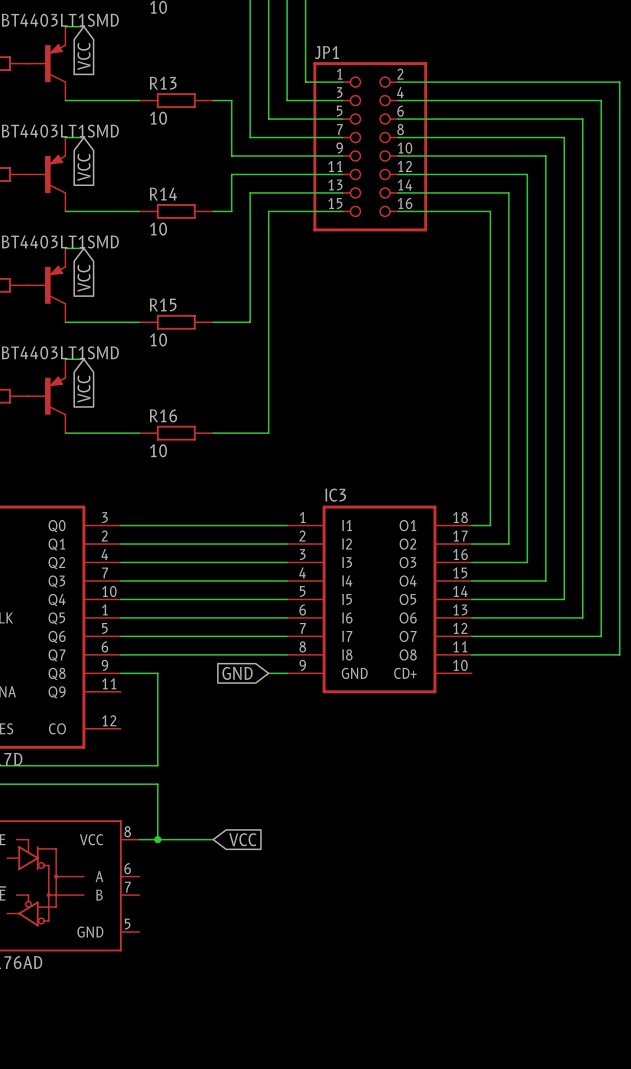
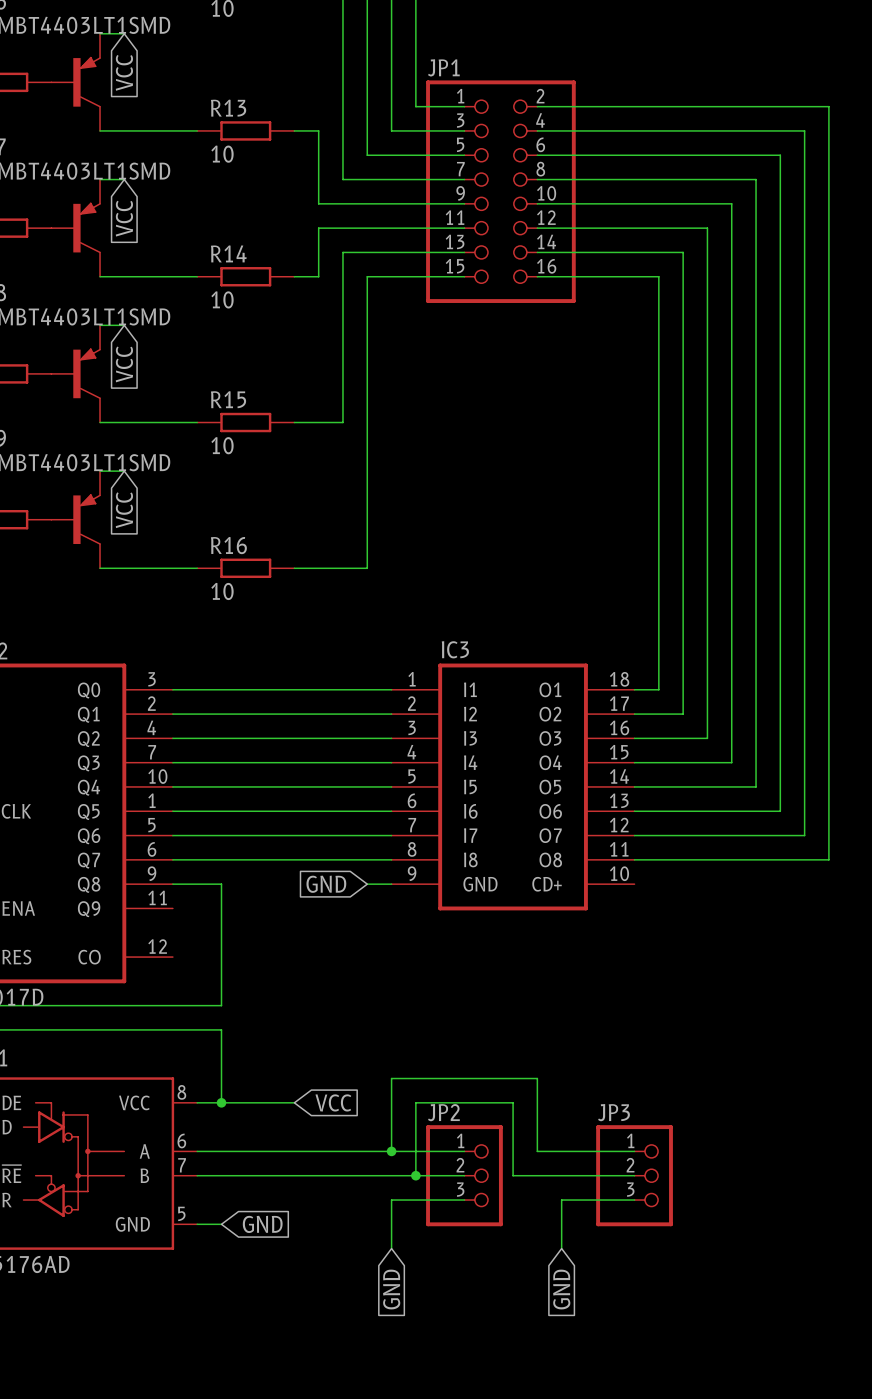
wire: none -> (197, 1151) (464, 1151)
wire: none -> (391, 1151) (391, 1078) (537, 1078) (537, 1151) (634, 1151)
junction: none -> (391, 1151)
wire: none -> (197, 1175) (464, 1175)
wire: none -> (415, 1175) (415, 1102) (513, 1102) (513, 1175) (634, 1175)
junction: none -> (415, 1175)
JP2: none -> (464, 1175)
JP3: none -> (634, 1175)
wire: none -> (464, 1200) (391, 1200) (391, 1248)
wire: none -> (634, 1200) (561, 1200) (561, 1248)
wire: none -> (197, 1224) (221, 1224)
global label: none -> GND (262, 1224)
global label: none -> GND (391, 1289)
global label: none -> GND (561, 1289)

